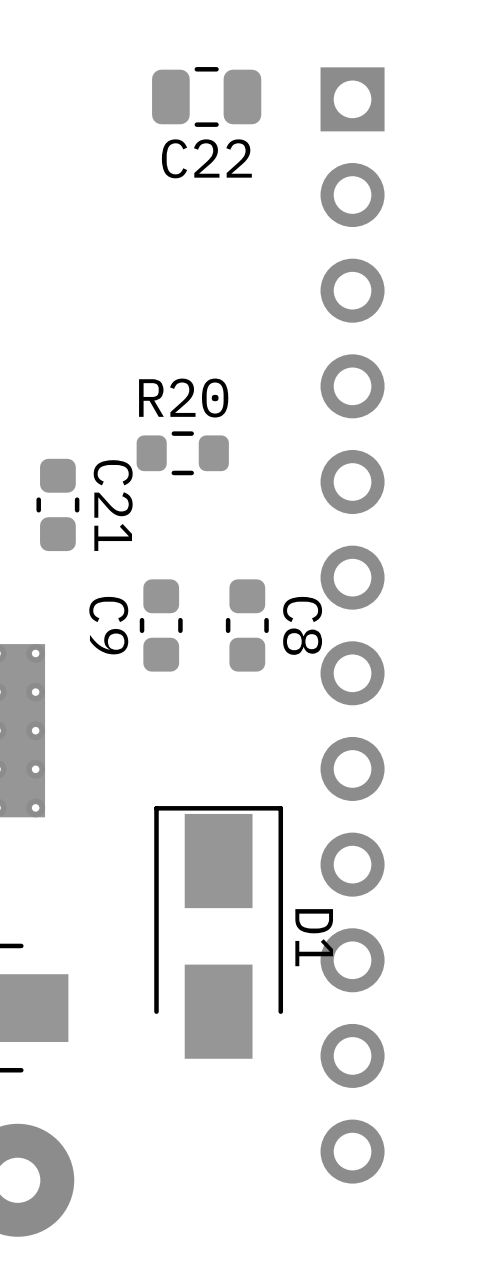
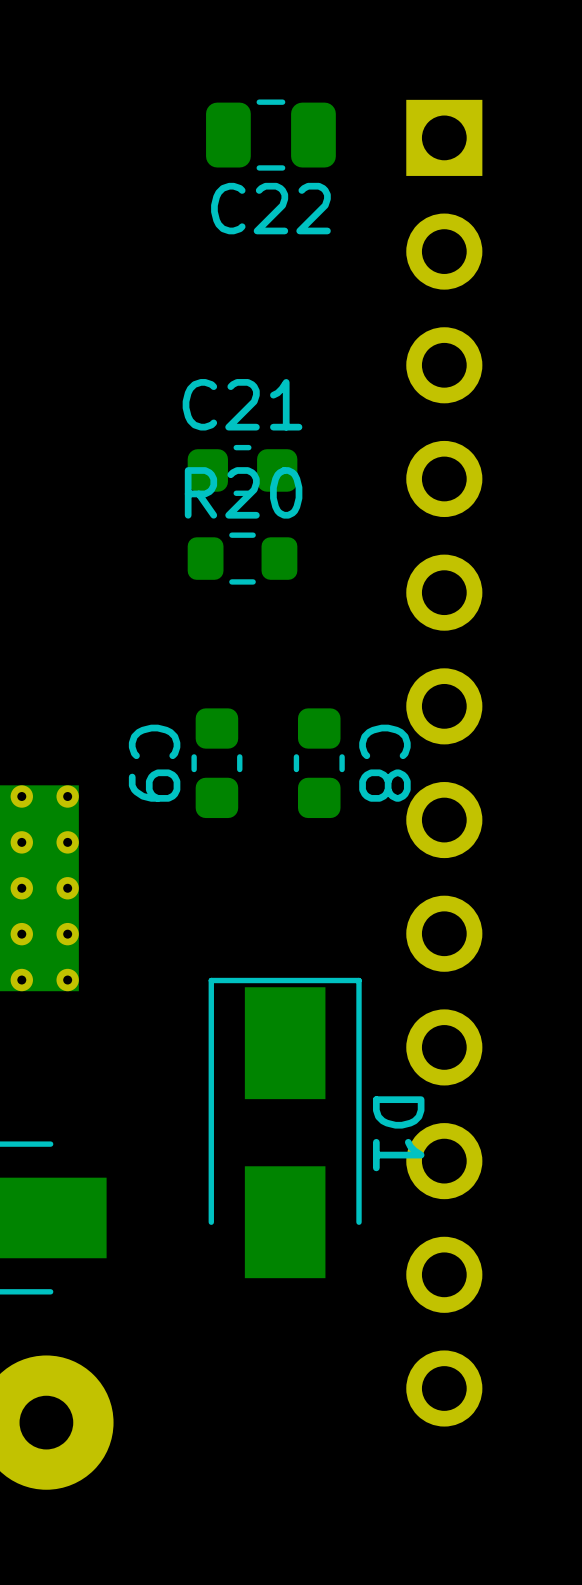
C21 rotation: 0° (57, 504) -> 90° clockwise (242, 470)
C21 position: (57, 504) -> (242, 470)
C21 name position: C21 (113, 505) -> C21 (242, 404)

